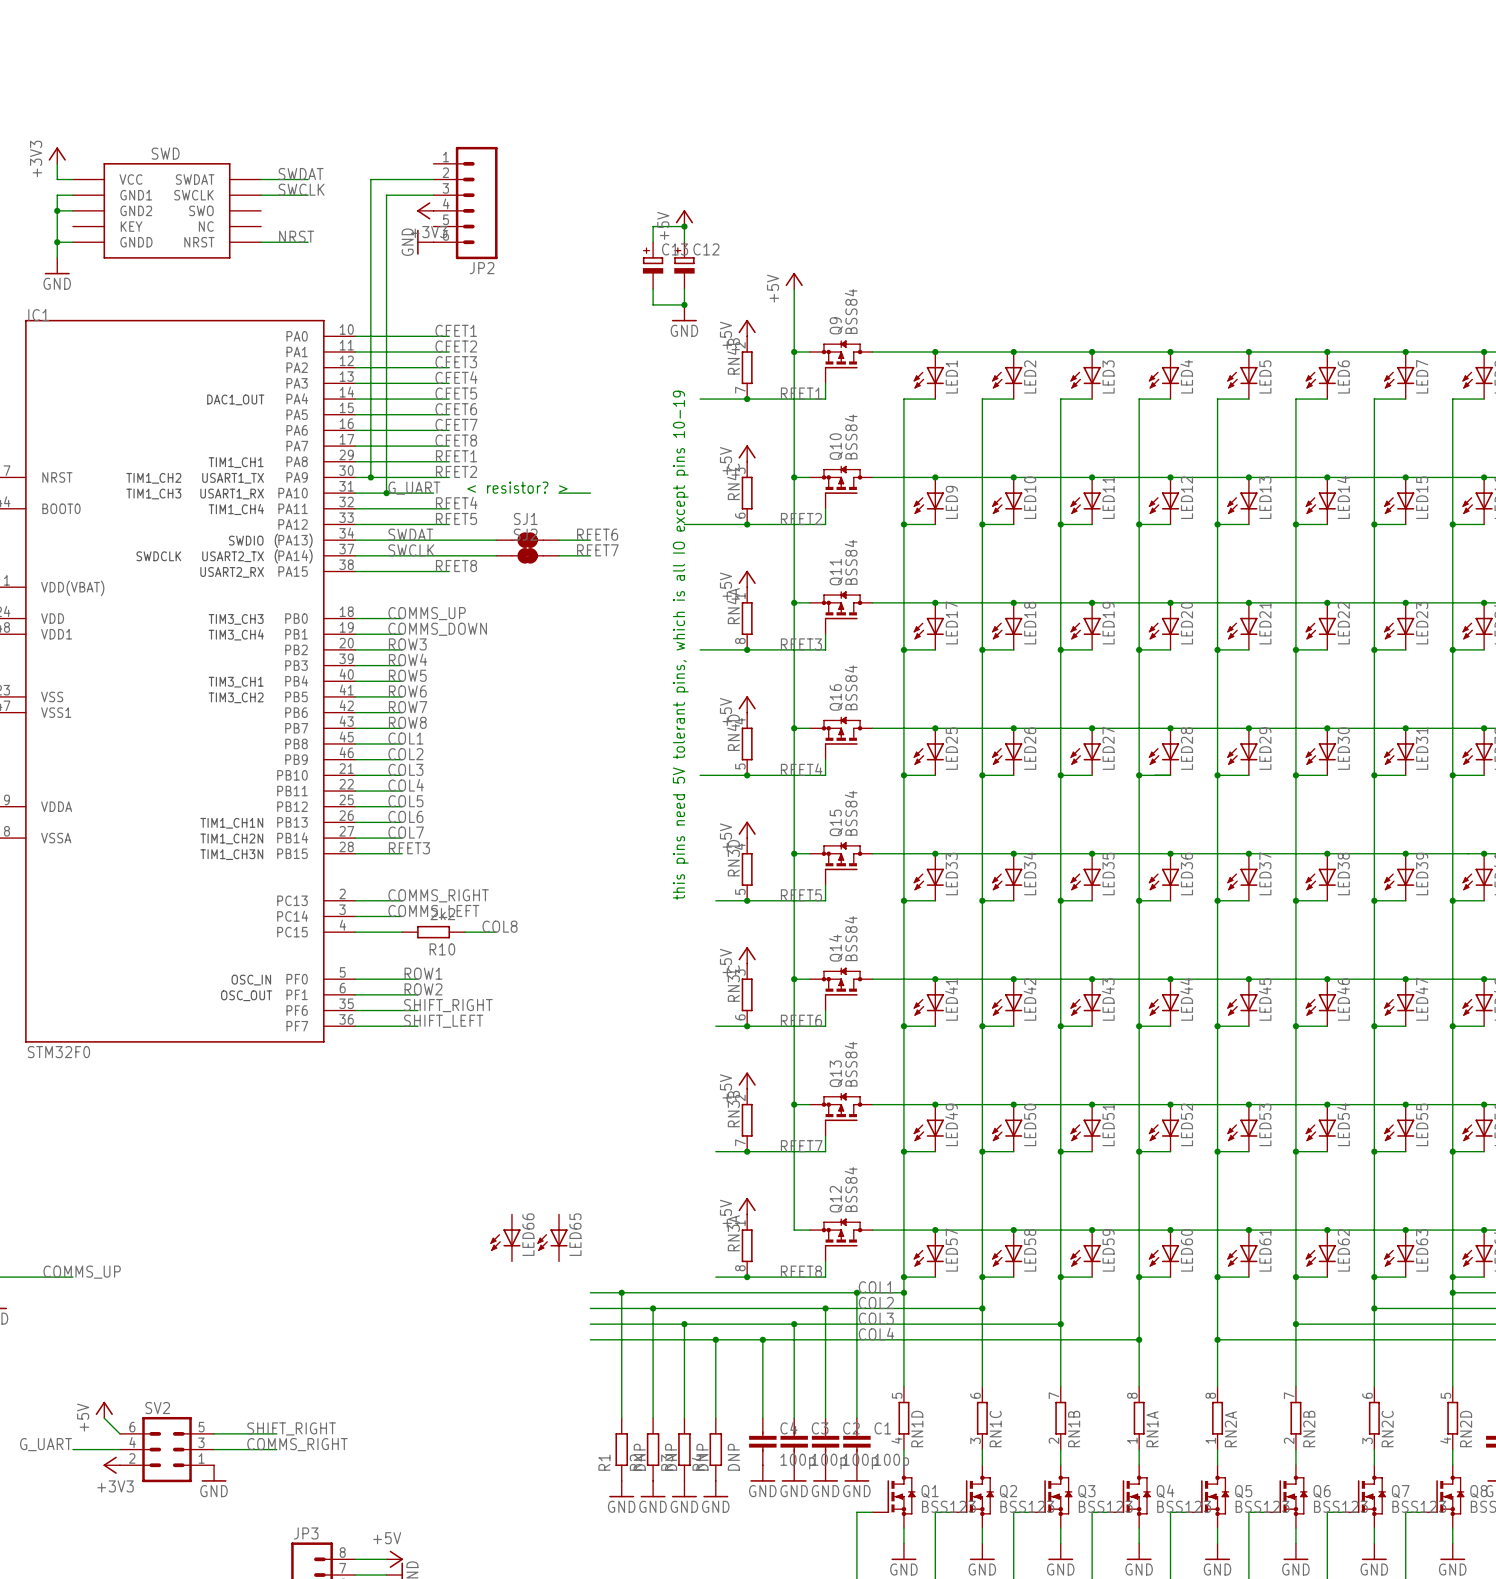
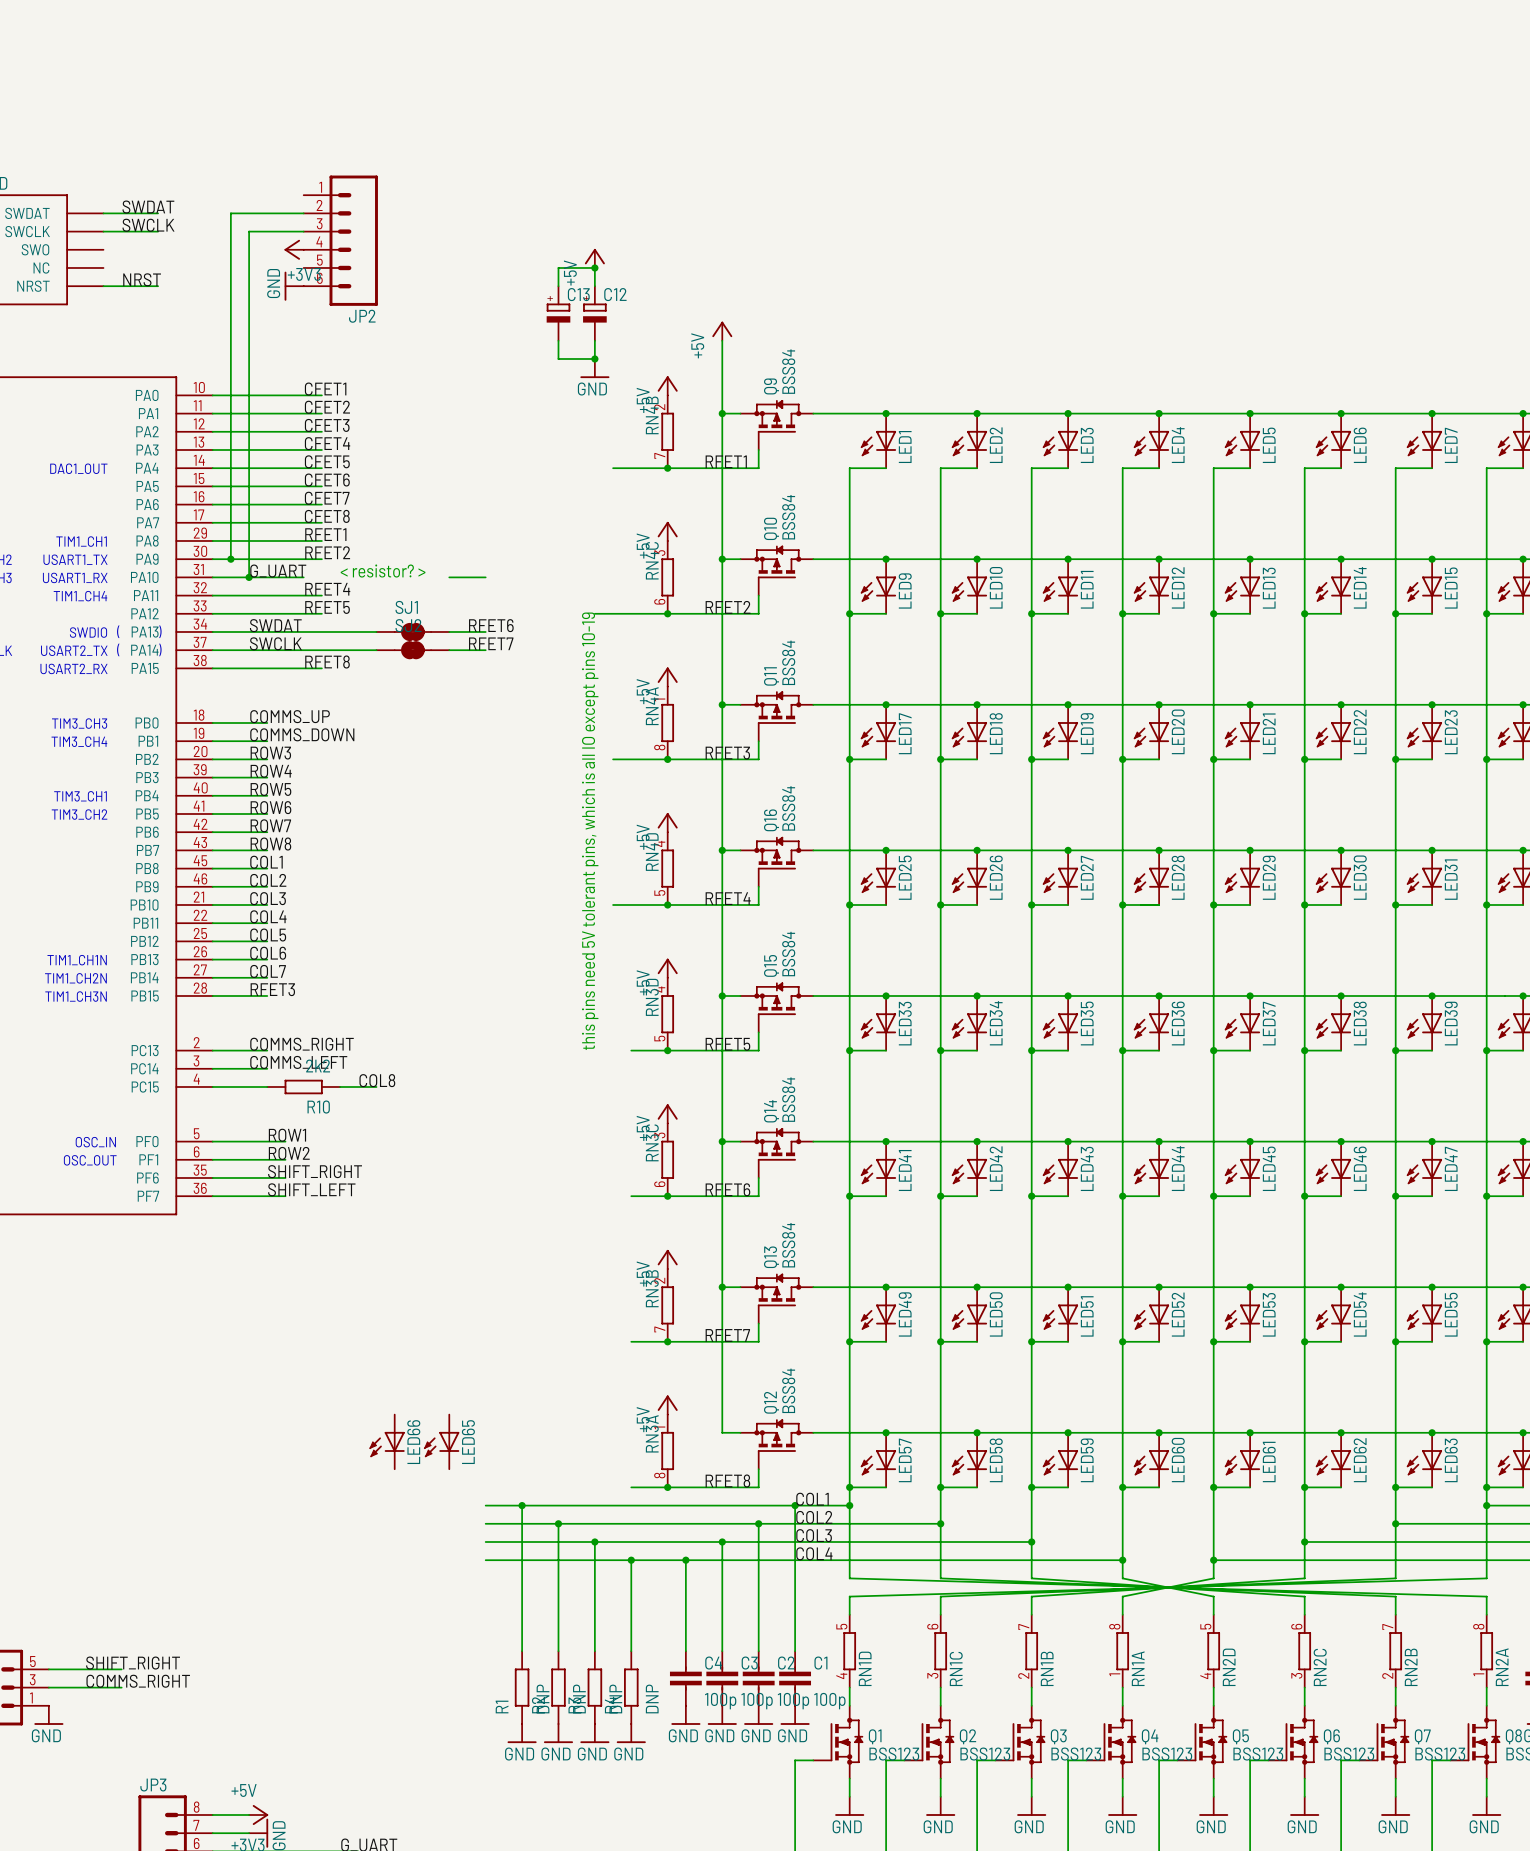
wire: (903, 1355) (903, 1371) -> (849, 1578) (1486, 1596)
wire: (982, 1355) (982, 1371) -> (940, 1578) (1395, 1596)
wire: (1060, 1355) (1060, 1371) -> (1031, 1578) (1304, 1596)
wire: (1139, 1355) (1139, 1371) -> (1122, 1578) (1213, 1596)
wire: (1217, 1355) (1217, 1371) -> (1213, 1578) (1122, 1596)
wire: (1295, 1355) (1295, 1371) -> (1304, 1578) (1031, 1596)
wire: (1374, 1355) (1374, 1371) -> (1395, 1578) (940, 1596)
wire: (1452, 1355) (1452, 1371) -> (1486, 1578) (849, 1596)
RN2A position: (1217, 1418) -> (1486, 1651)
RN2B position: (1295, 1418) -> (1395, 1651)
RN2C position: (1374, 1418) -> (1304, 1651)
RN2D position: (1452, 1418) -> (1213, 1651)

